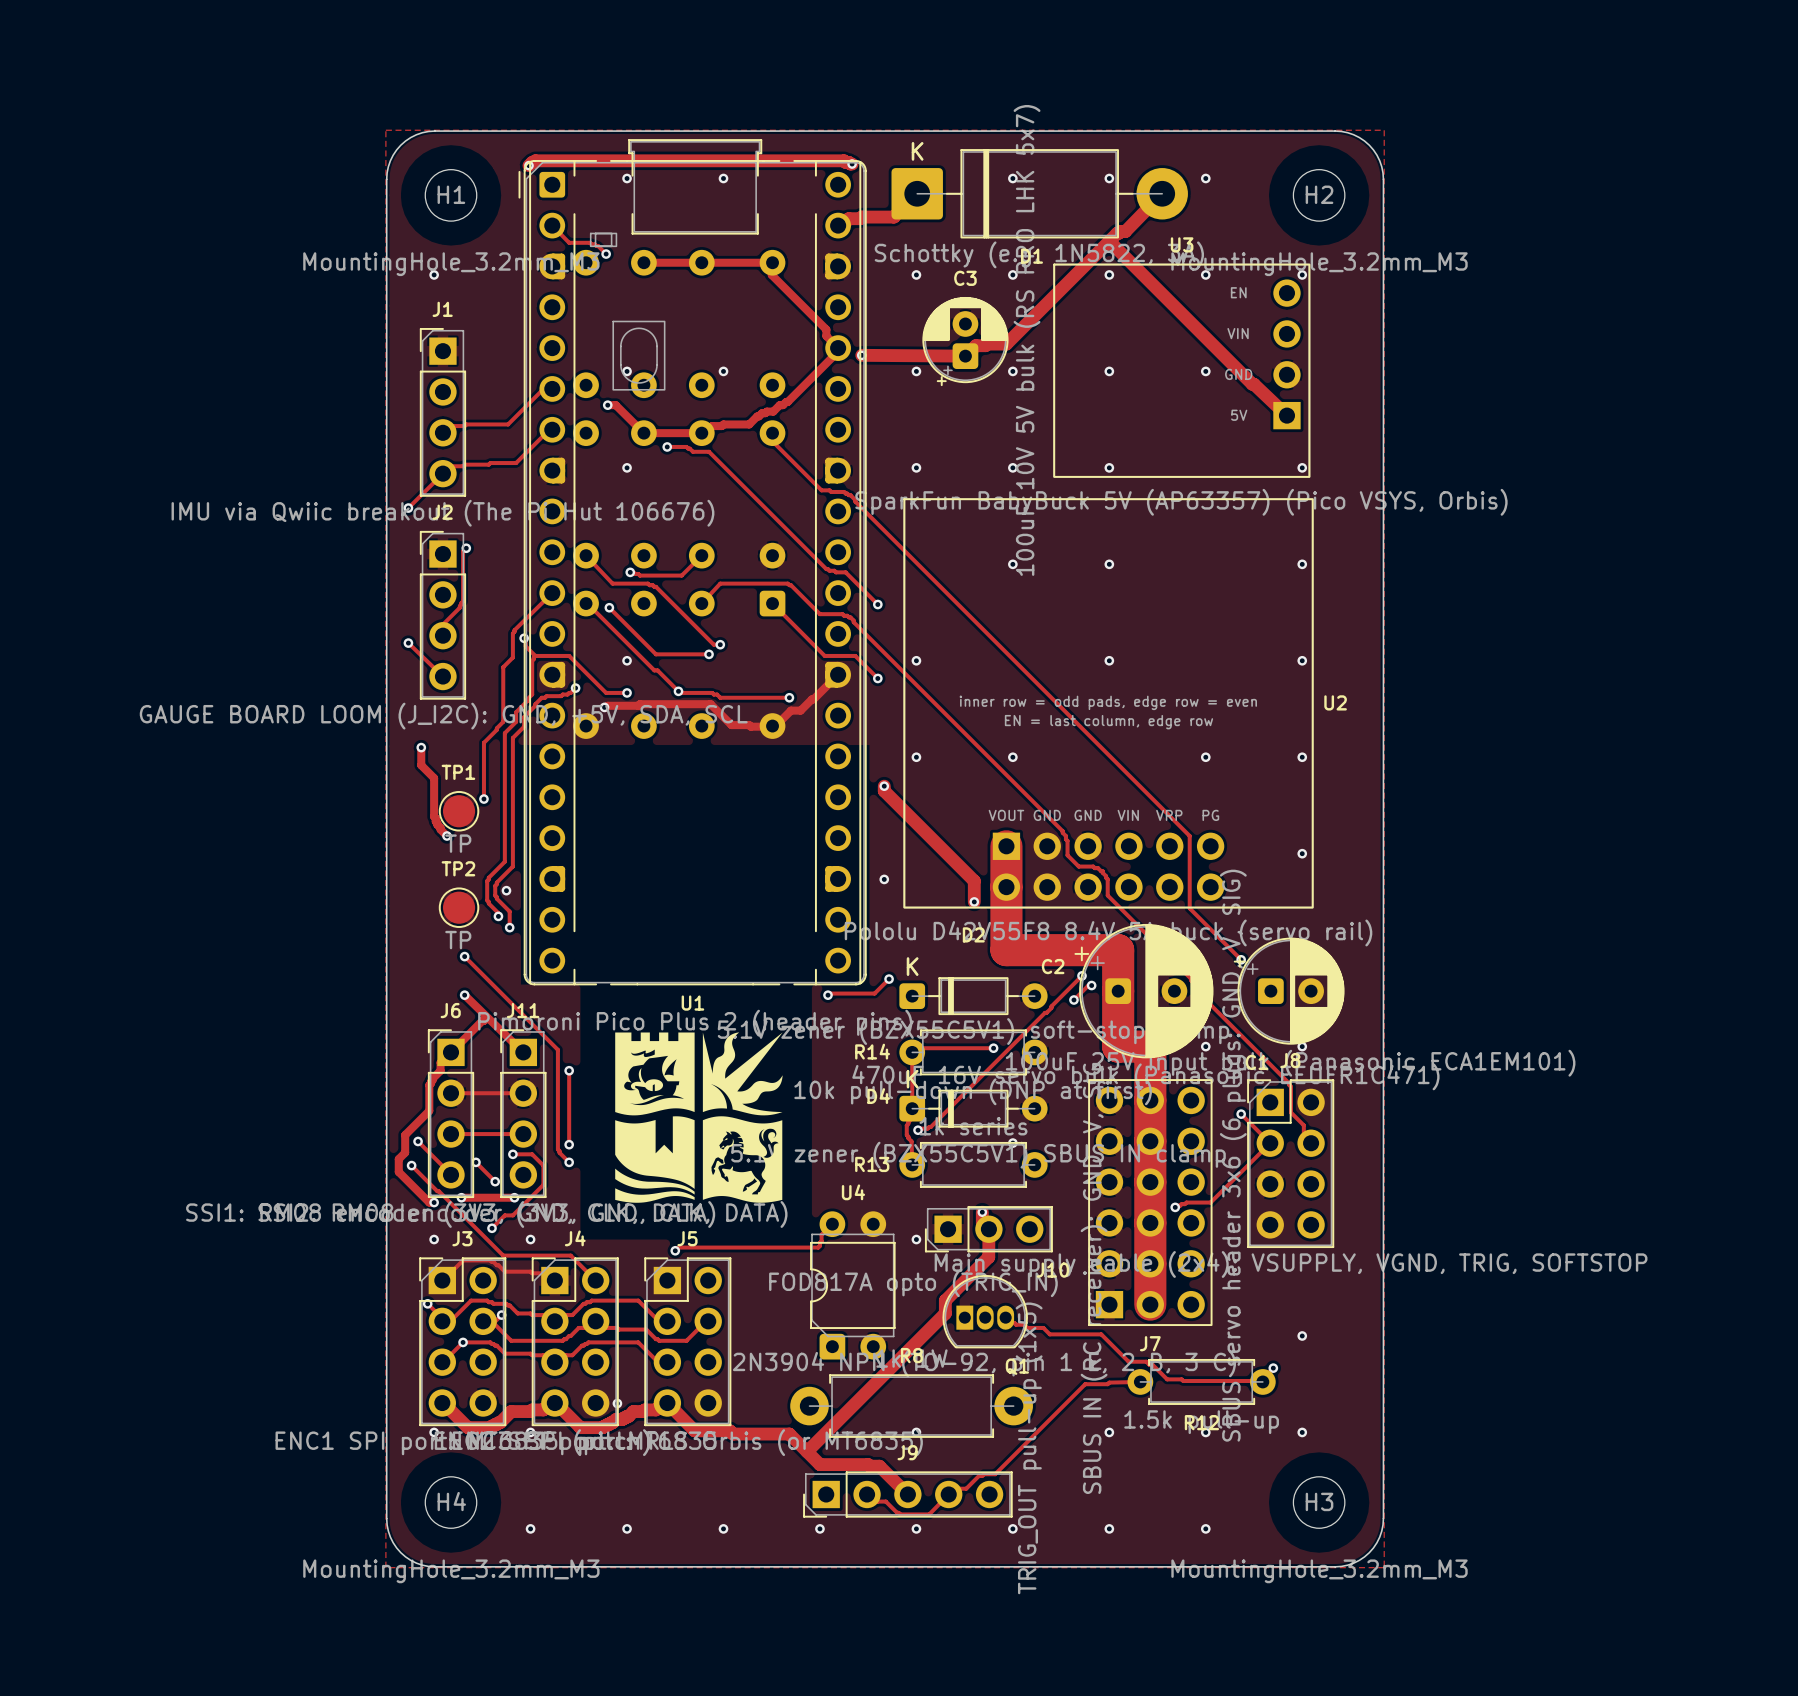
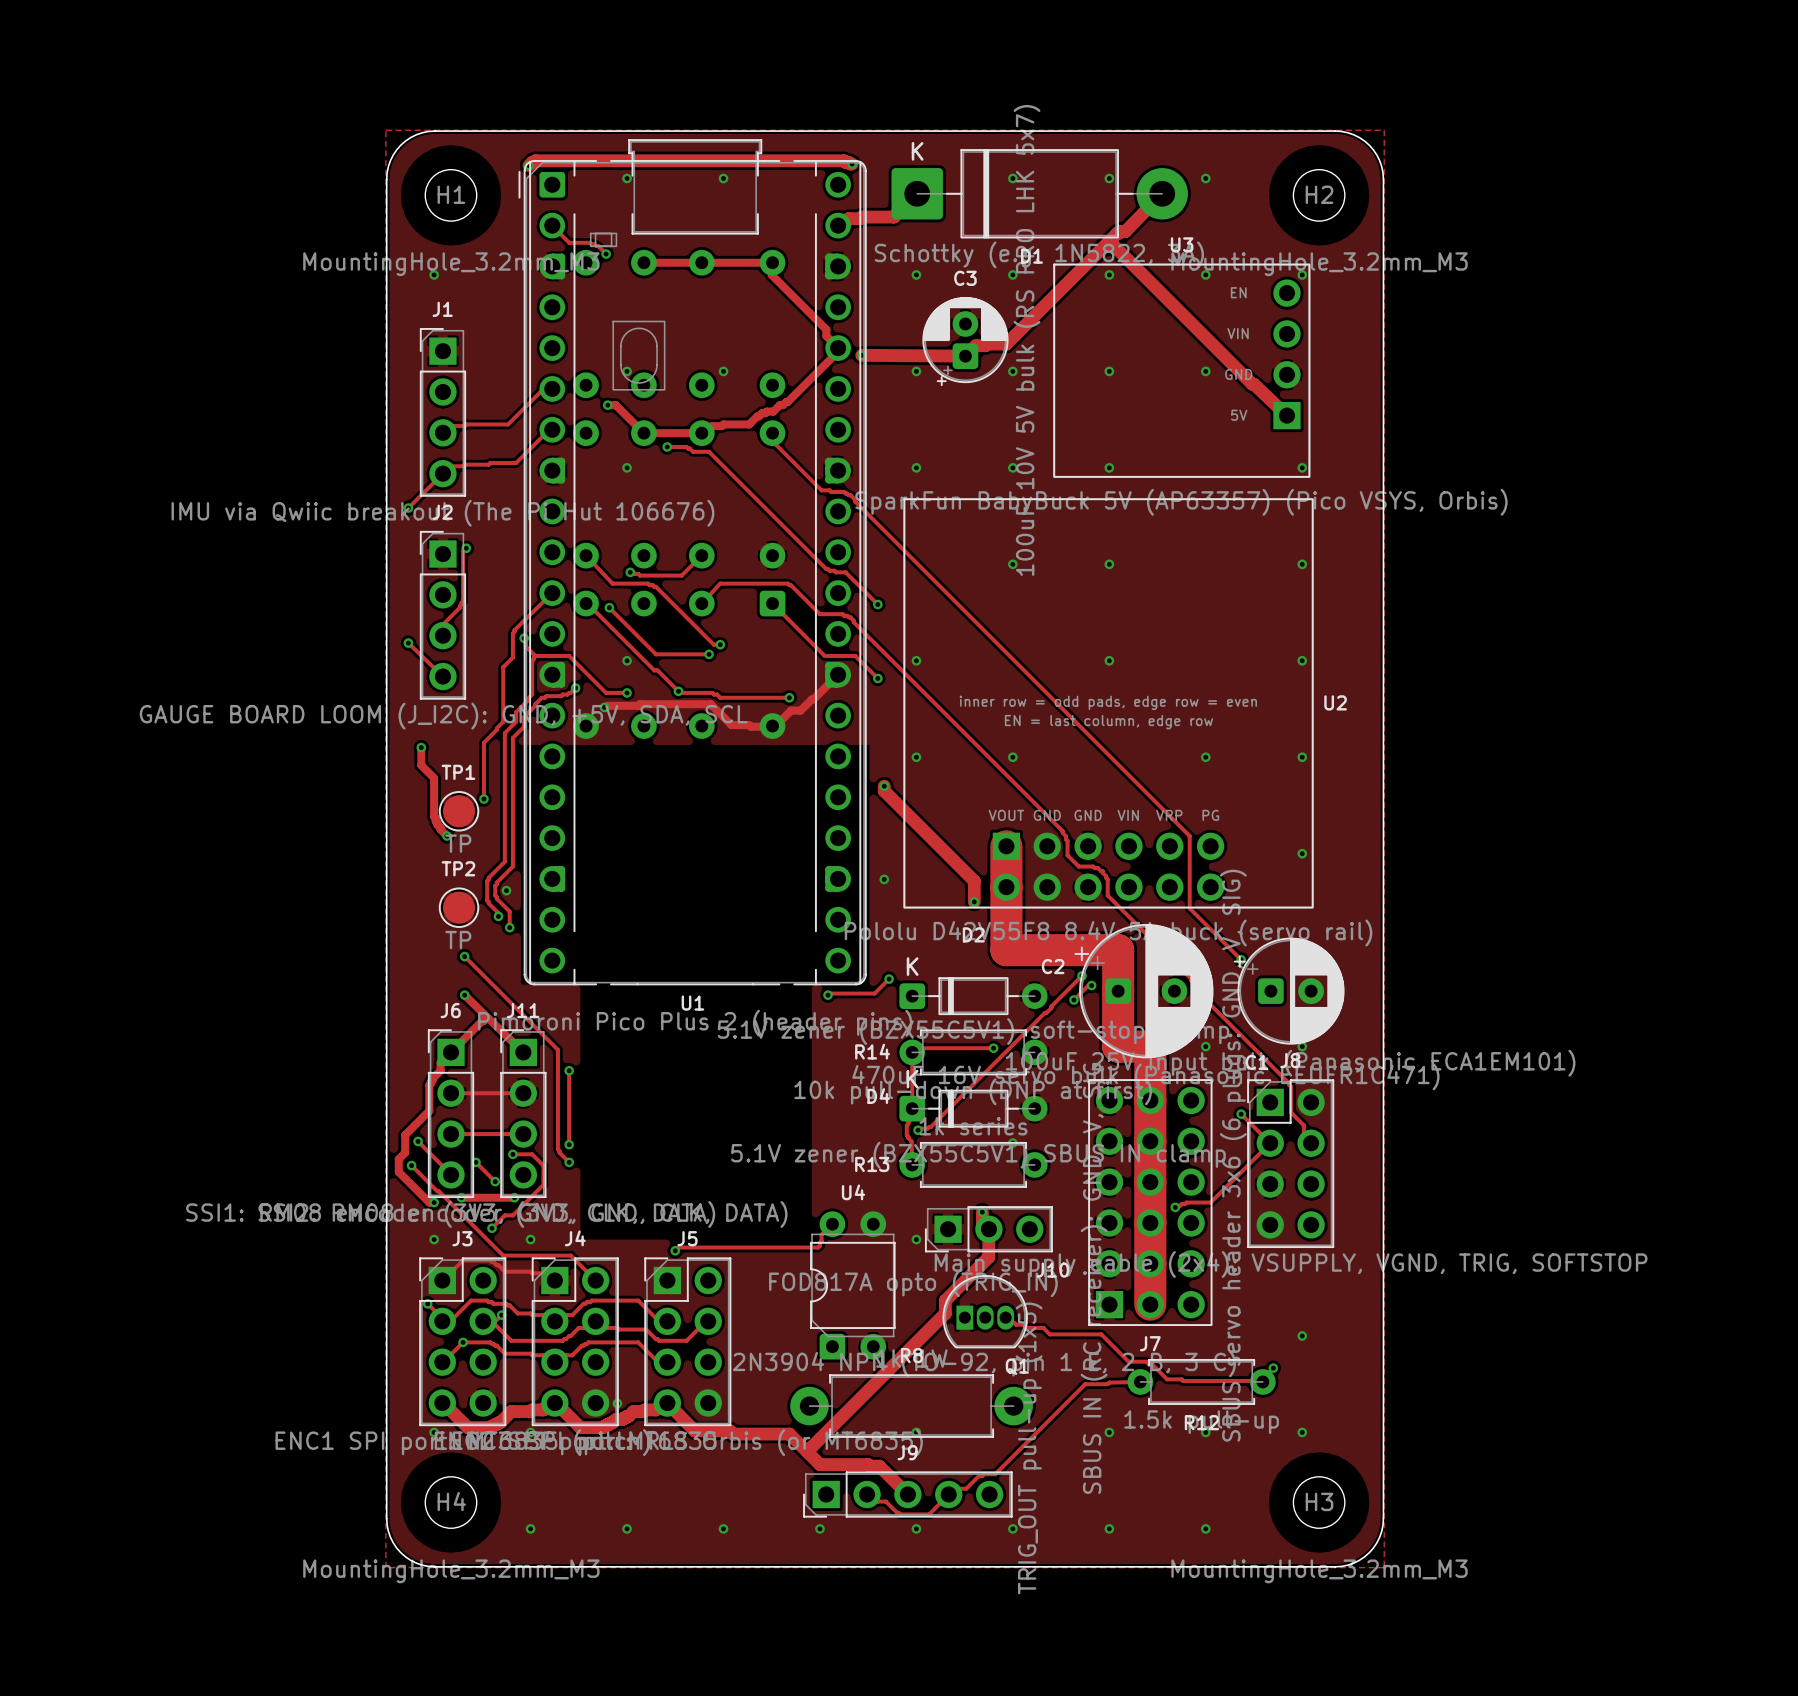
drawing: [615, 1032, 783, 1203] -> none

